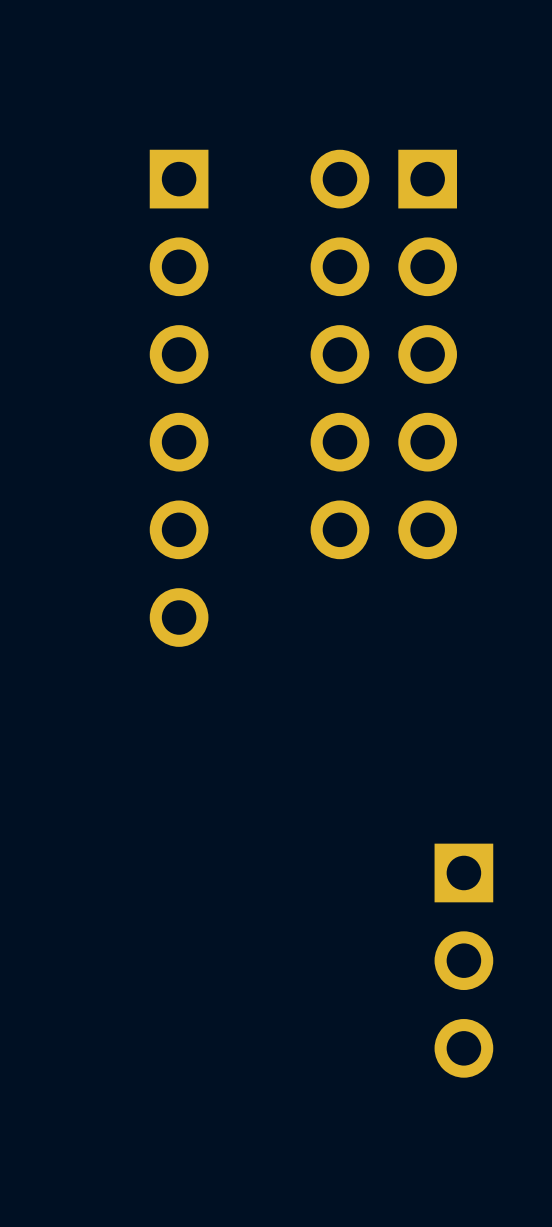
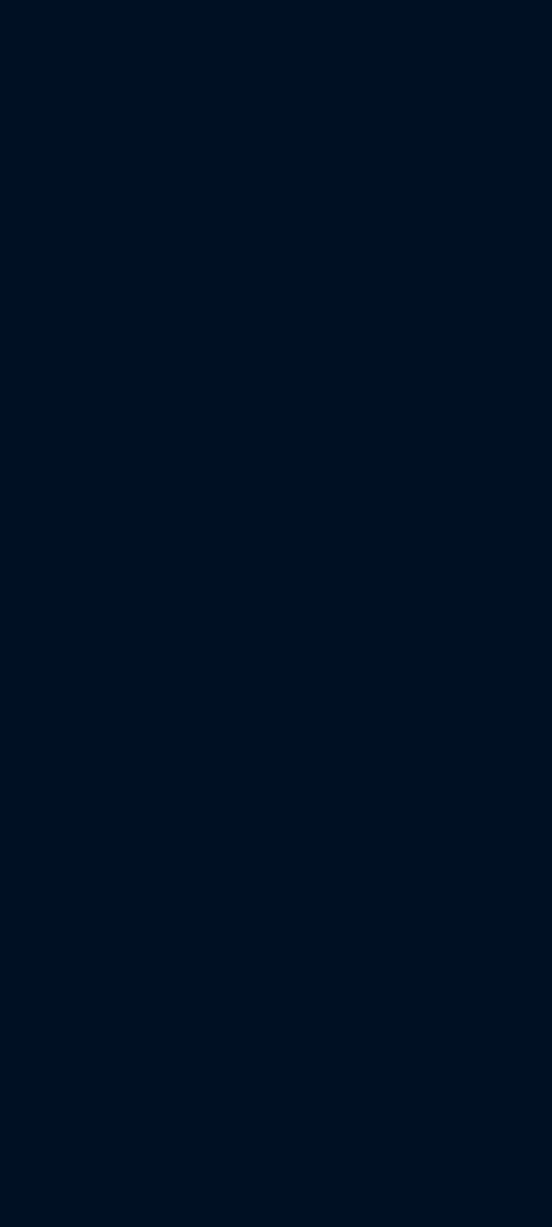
part: (383, 354) -> none
part: (179, 398) -> none
part: (463, 960) -> none

